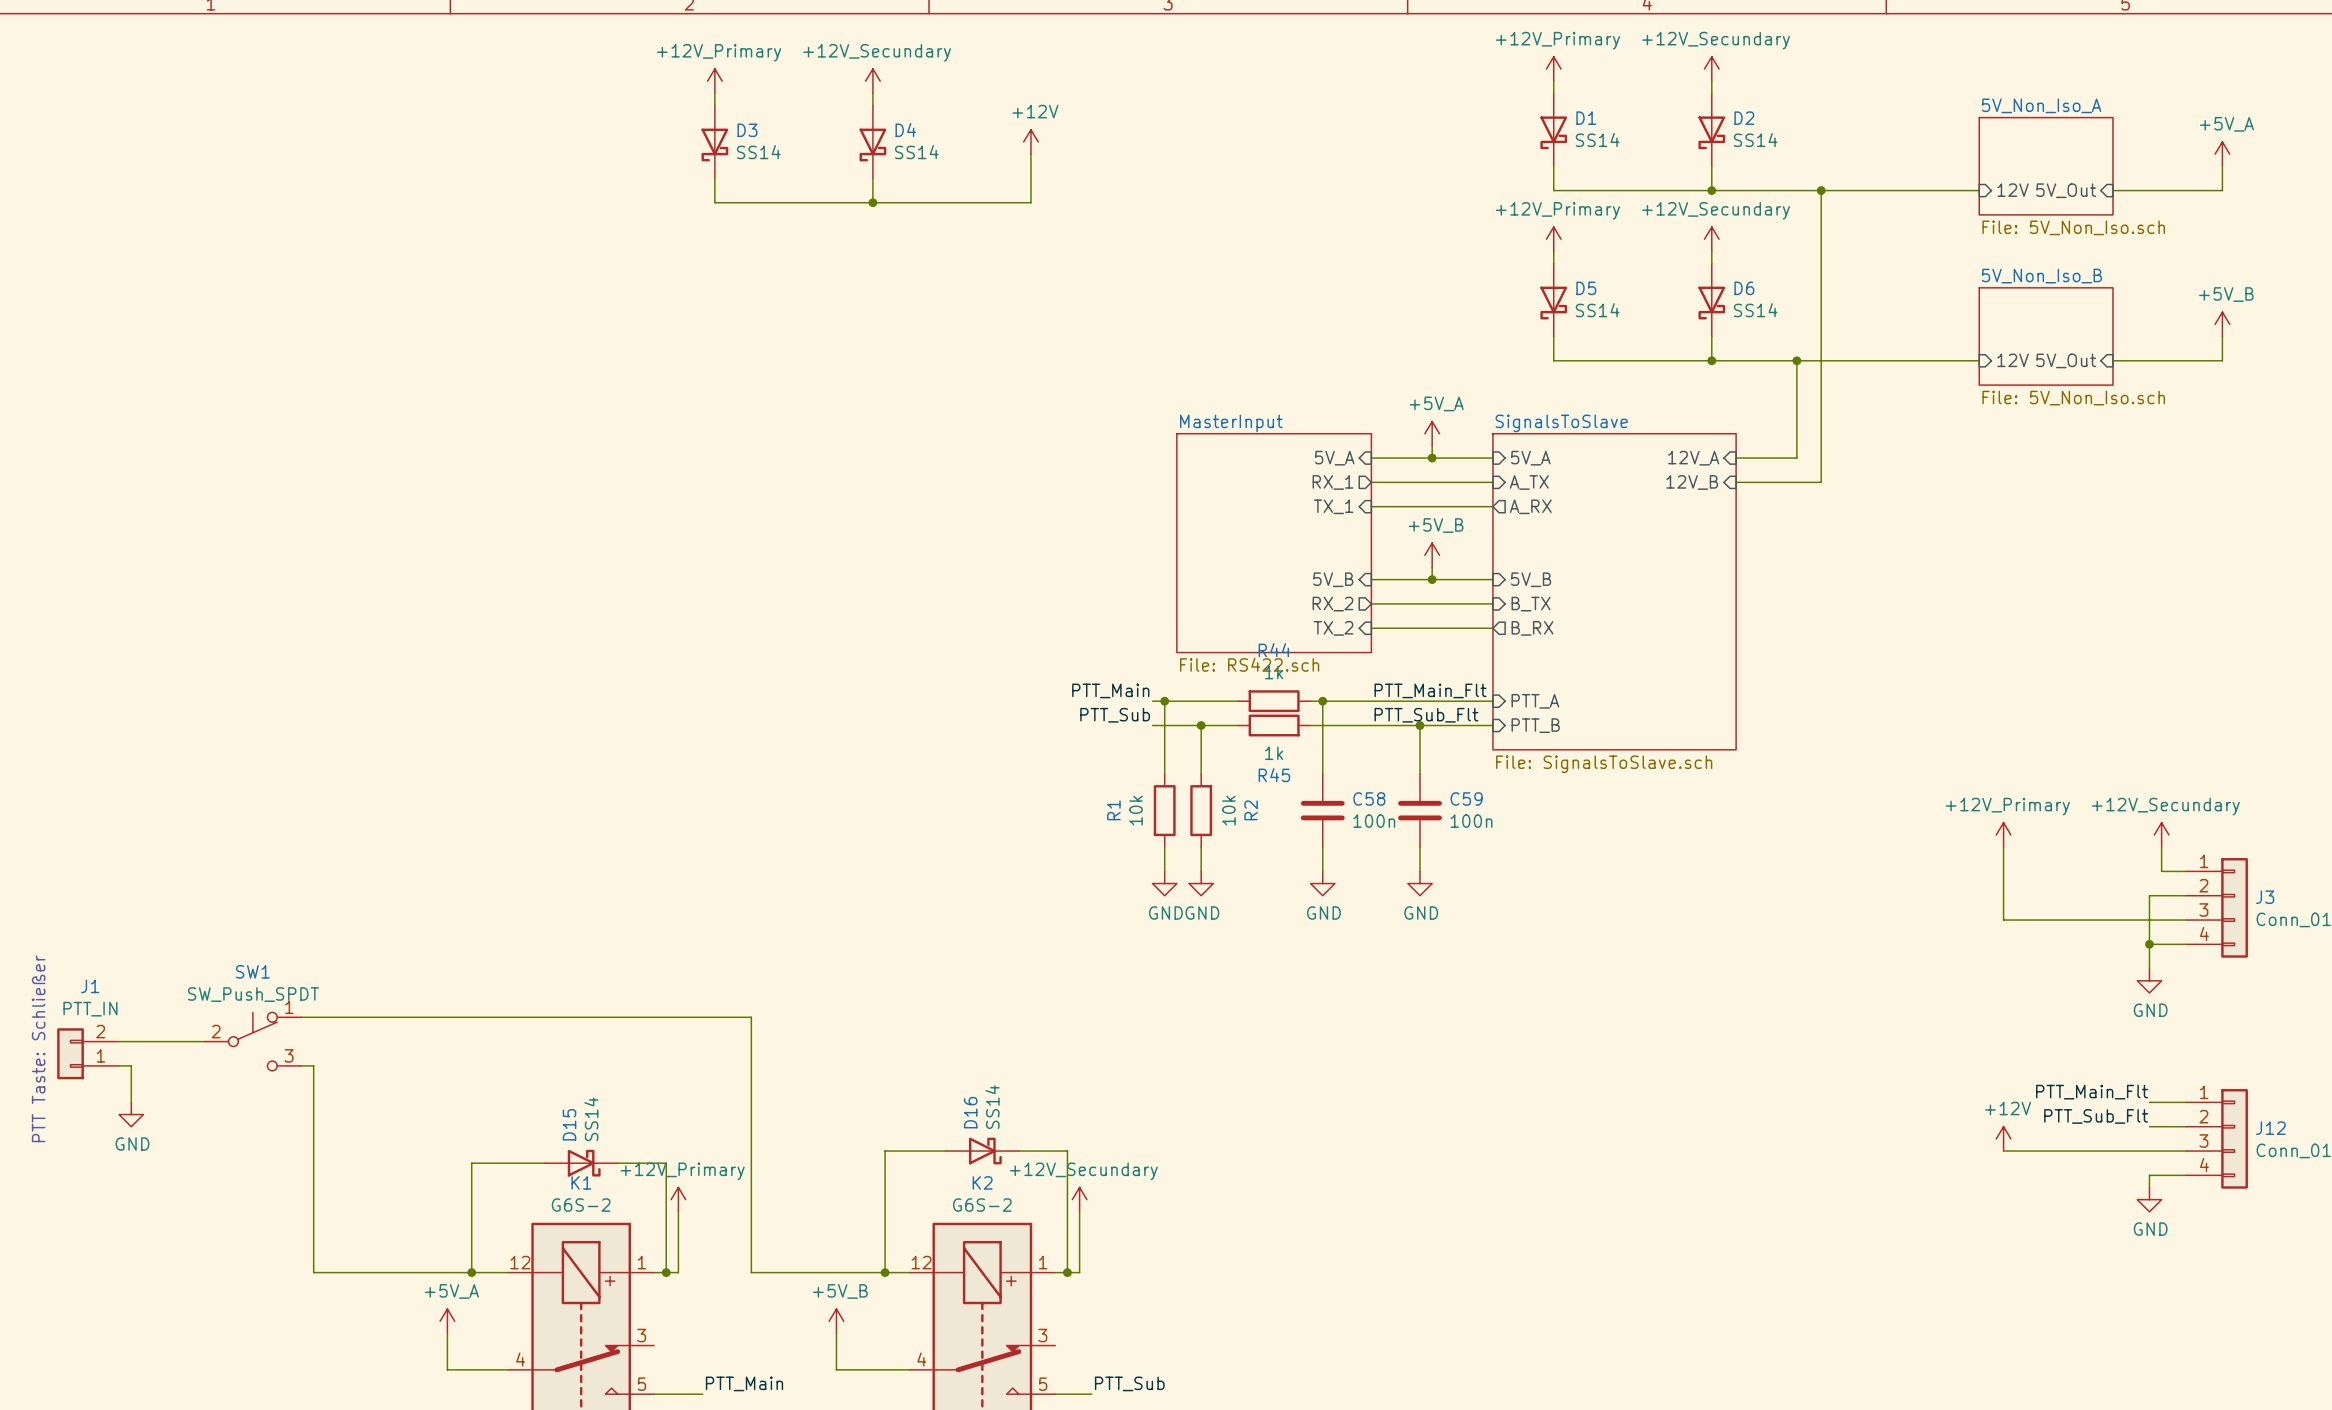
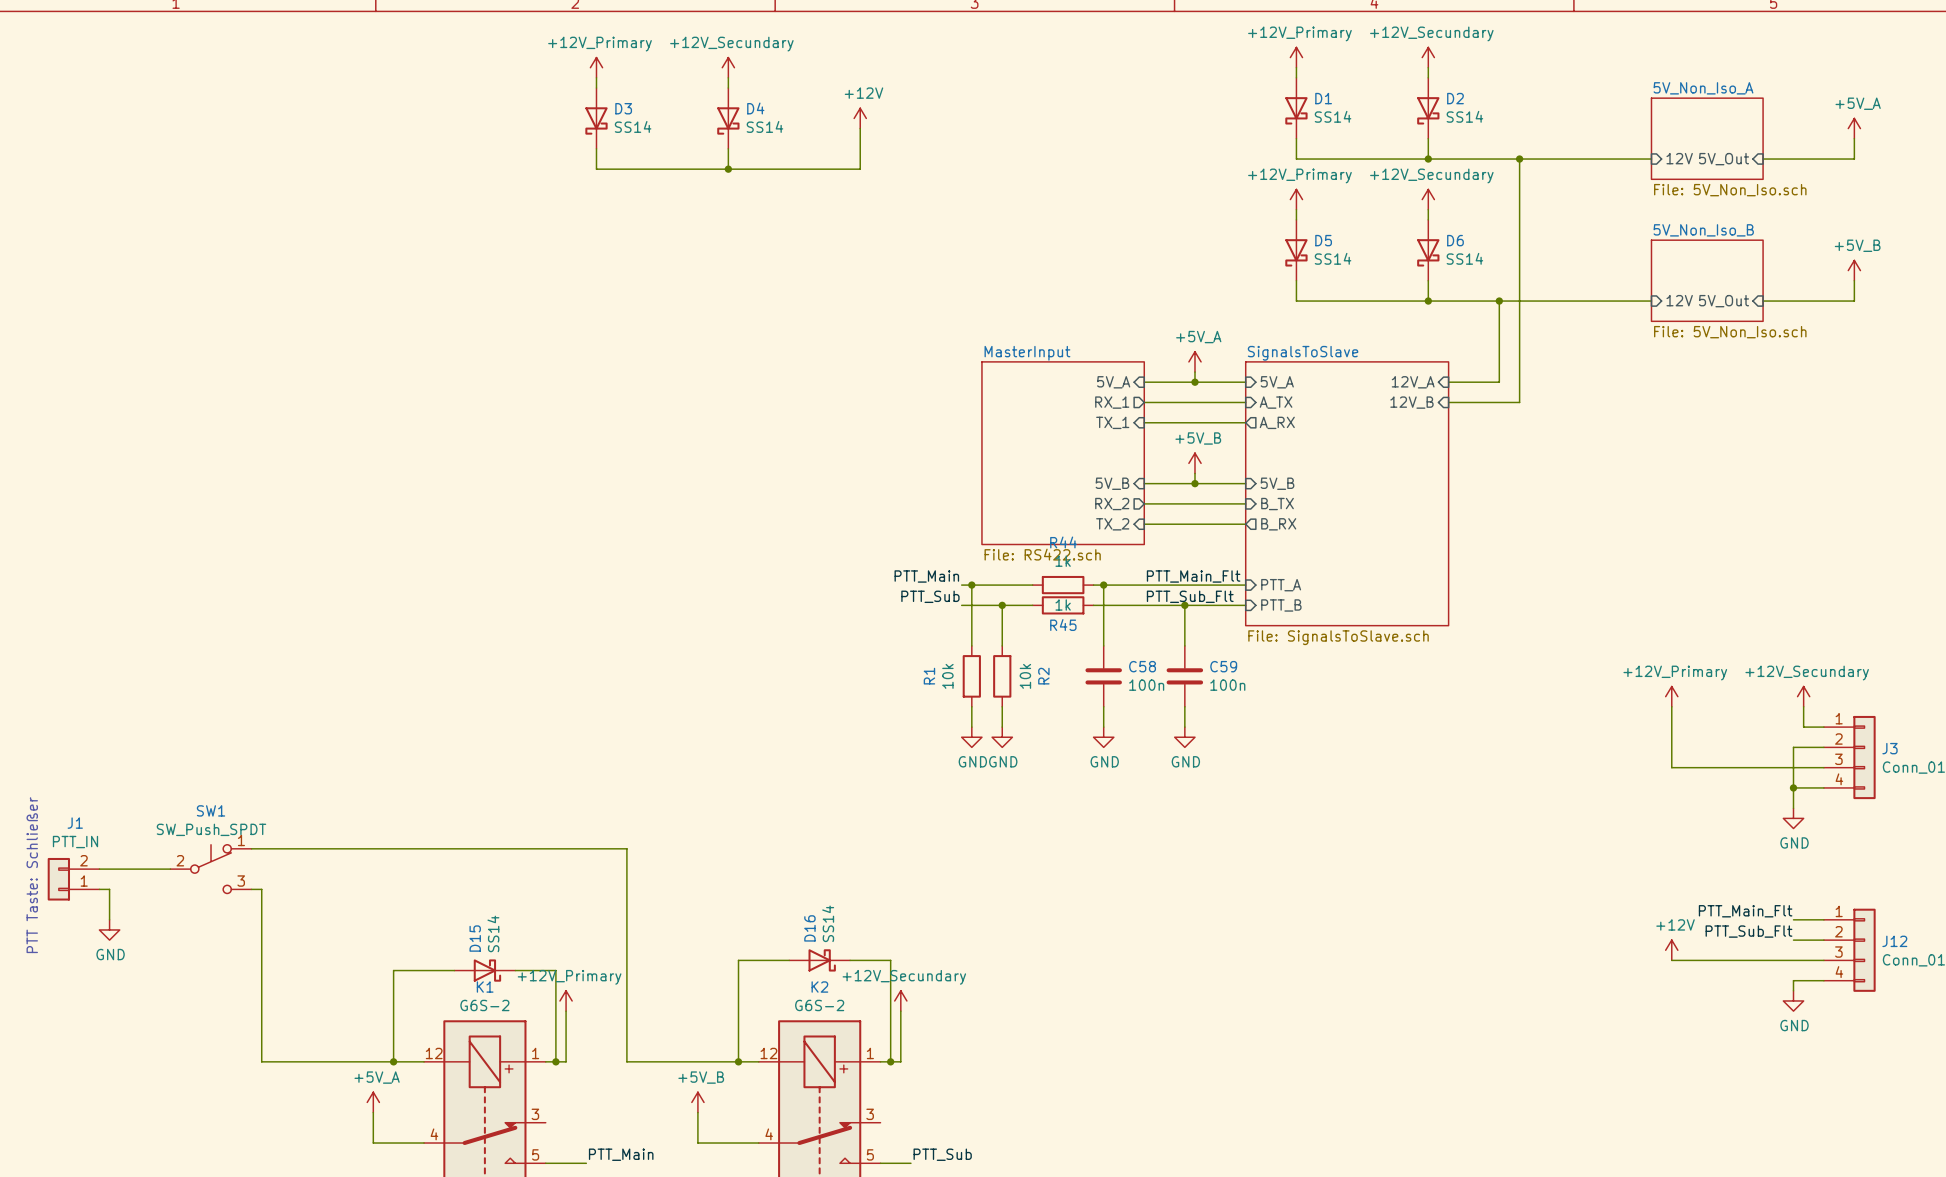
R45 value position: 1k (1274, 753) -> 1k (1063, 604)
R45 name position: R45 (1274, 775) -> R45 (1063, 625)

